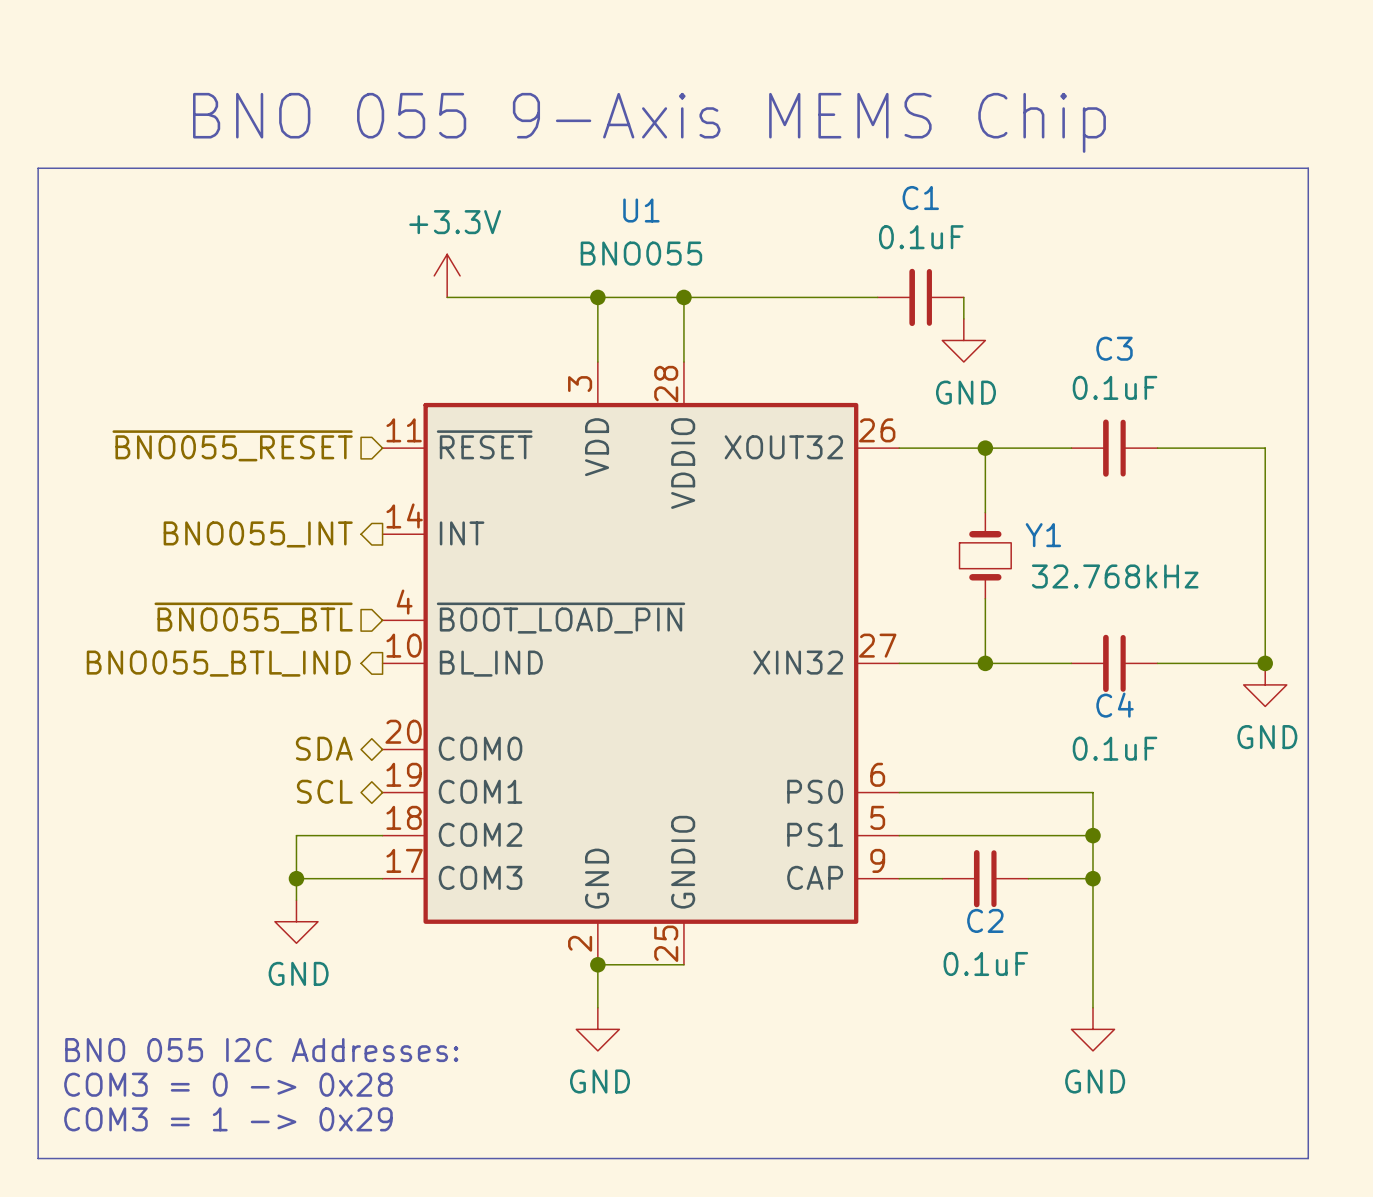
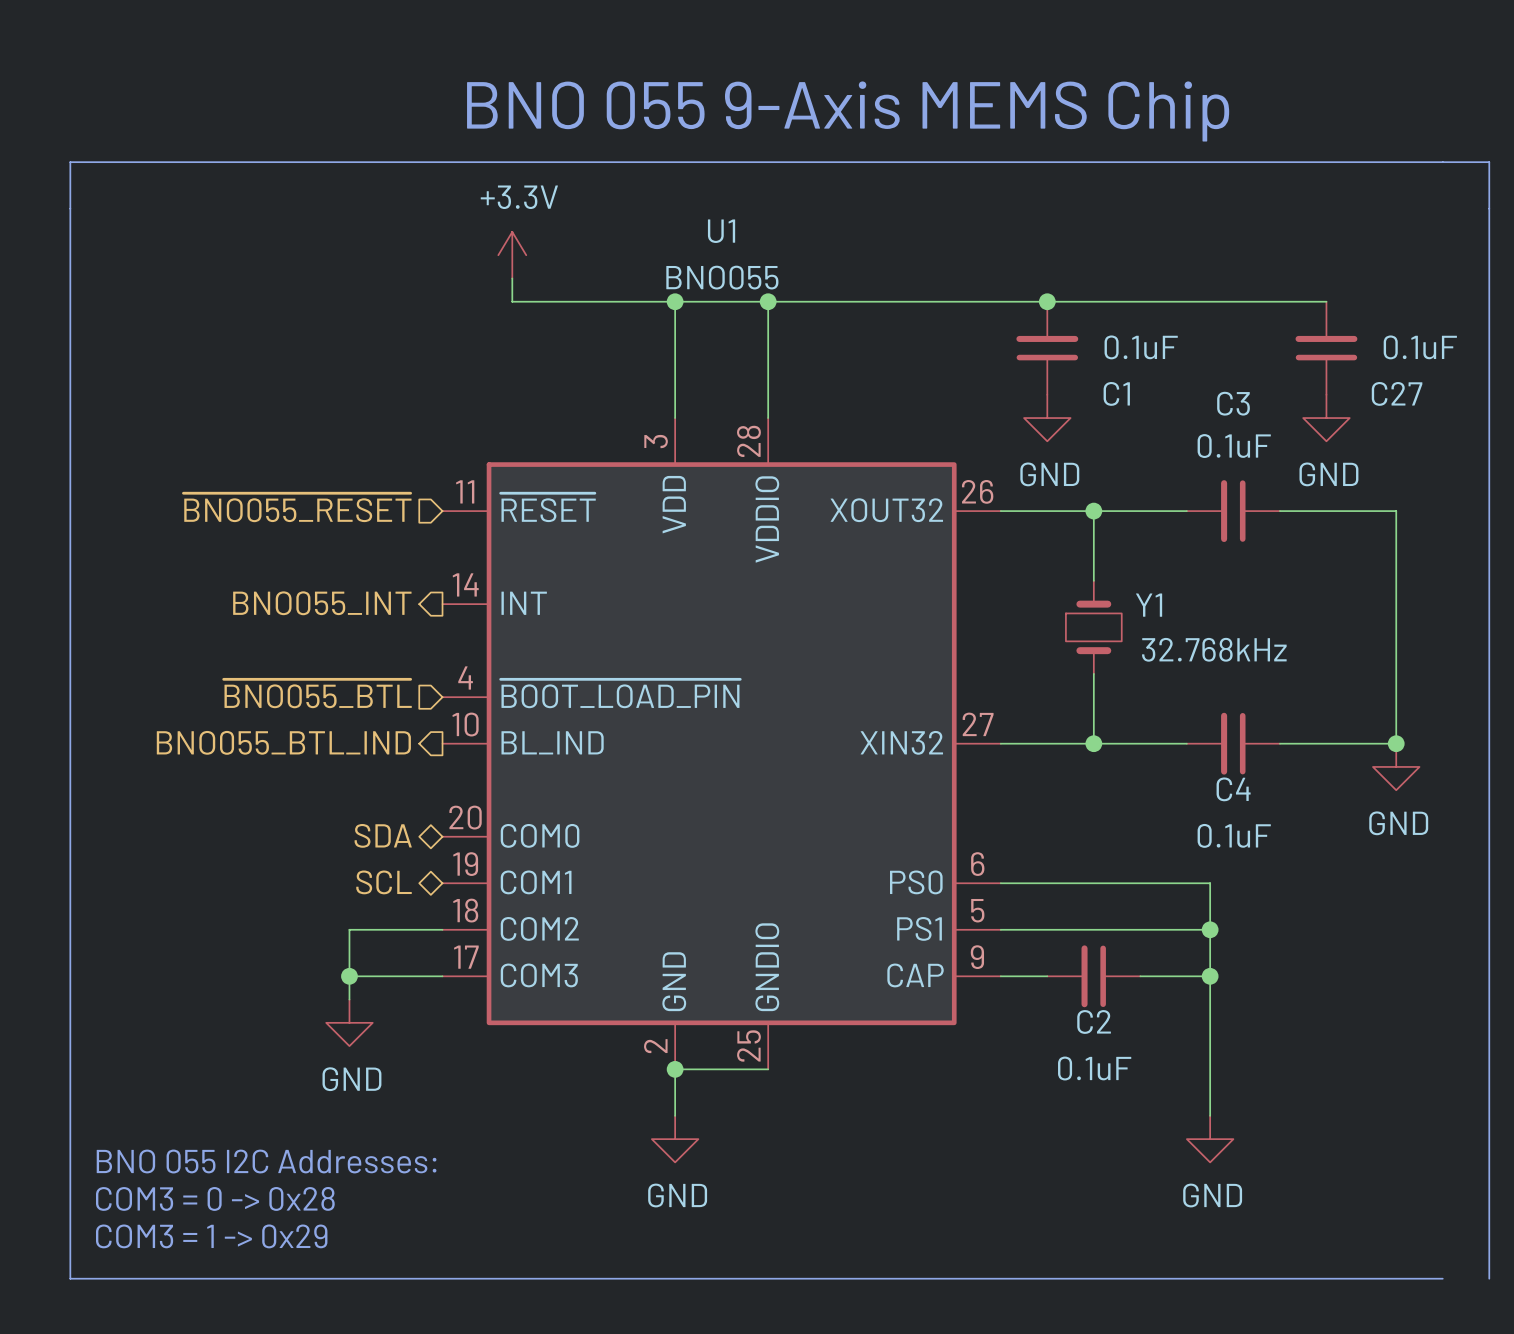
text position: BNO 055 9-Axis MEMS Chip (649, 122) -> BNO 055 9-Axis MEMS Chip (848, 111)
line: (38, 168) (1308, 168) (1308, 1158) -> (70, 208) (70, 162) (1489, 162) (1489, 1278)
C1 name position: C1 (920, 198) -> C1 (1116, 393)
U1 name position: U1 (641, 210) -> U1 (721, 231)
wire: none -> (512, 278) (512, 301) (1326, 301)
U1 value position: BNO055 (641, 253) -> BNO055 (722, 277)
wire: none -> (675, 301) (675, 348)
wire: none -> (768, 301) (768, 348)
junction: none -> (1047, 301)
power symbol position: +3.3V (447, 275) -> +3.3V (512, 255)
wire: (447, 297) (877, 297) -> none
junction position: (597, 297) -> (675, 301)
junction position: (683, 297) -> (768, 301)
C1 rotation: 0° (920, 297) -> 90° clockwise (1047, 348)
wire: (963, 297) (963, 318) -> none
C27: none -> 0.1uF (1326, 348)
power symbol position: GND (963, 340) -> GND (1047, 418)
power symbol: none -> GND (1326, 418)

